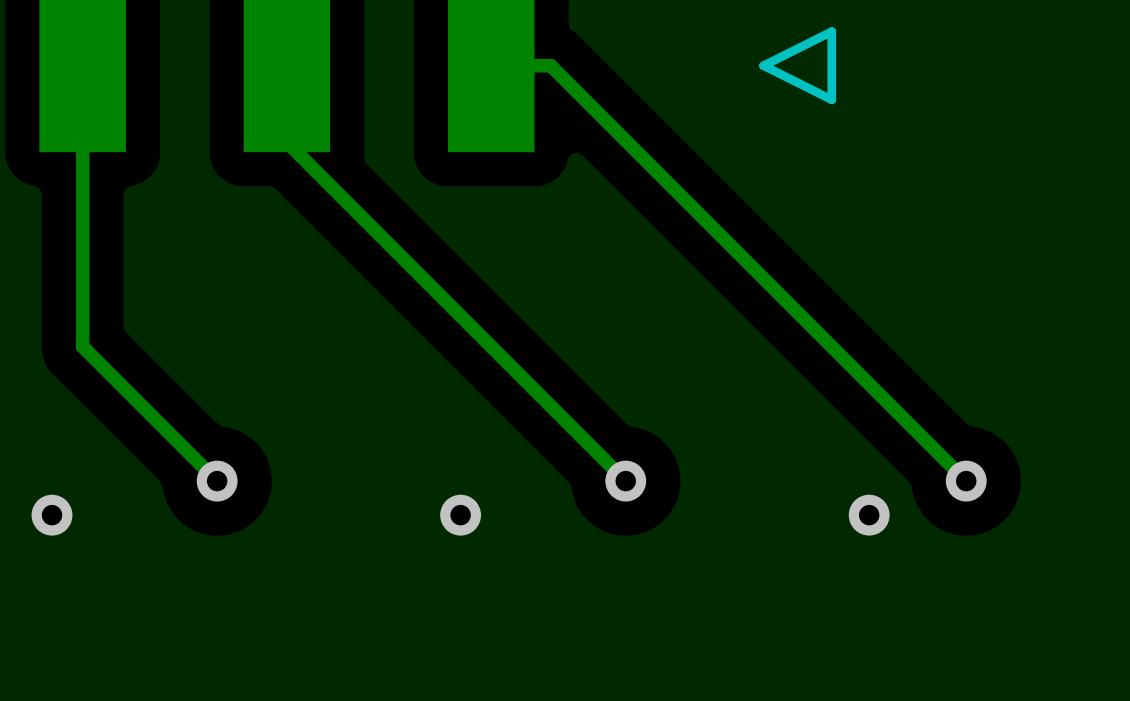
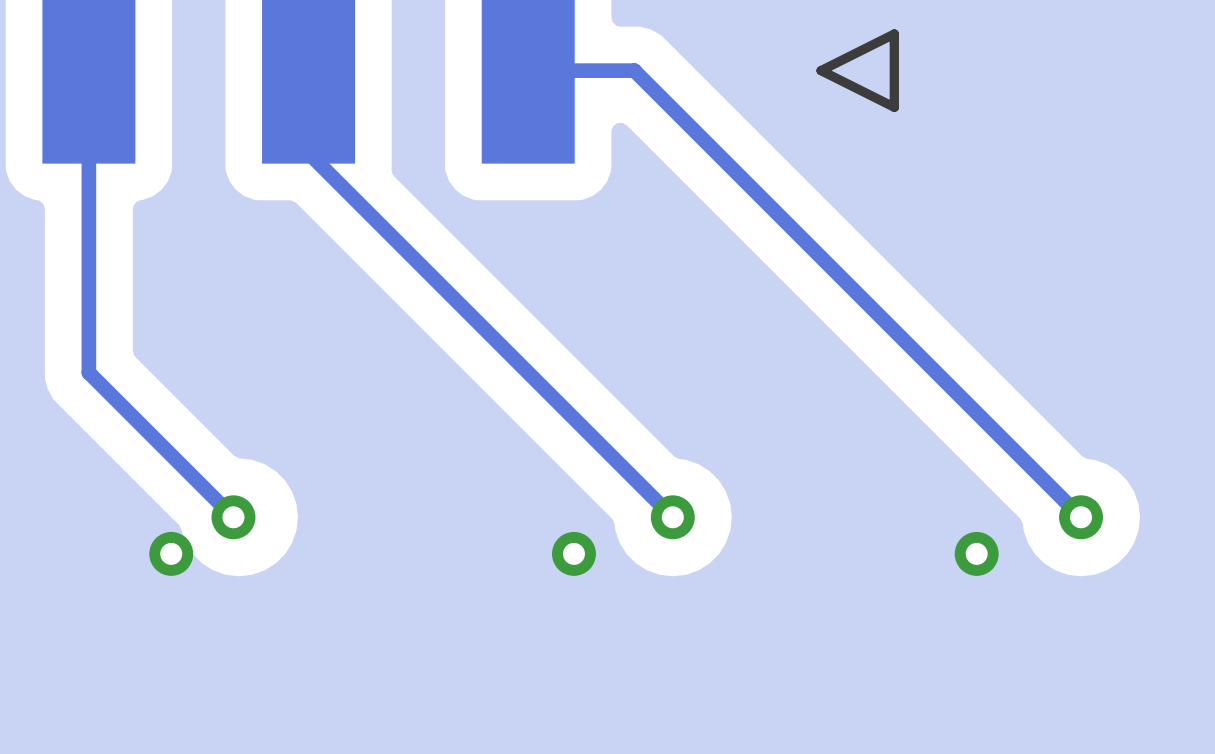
track: (550, 65) (966, 481) -> (592, 70) (634, 70) (1081, 517)
via position: (966, 481) -> (1081, 517)
via position: (52, 515) -> (171, 553)
via position: (460, 515) -> (573, 553)
via position: (869, 515) -> (976, 553)

